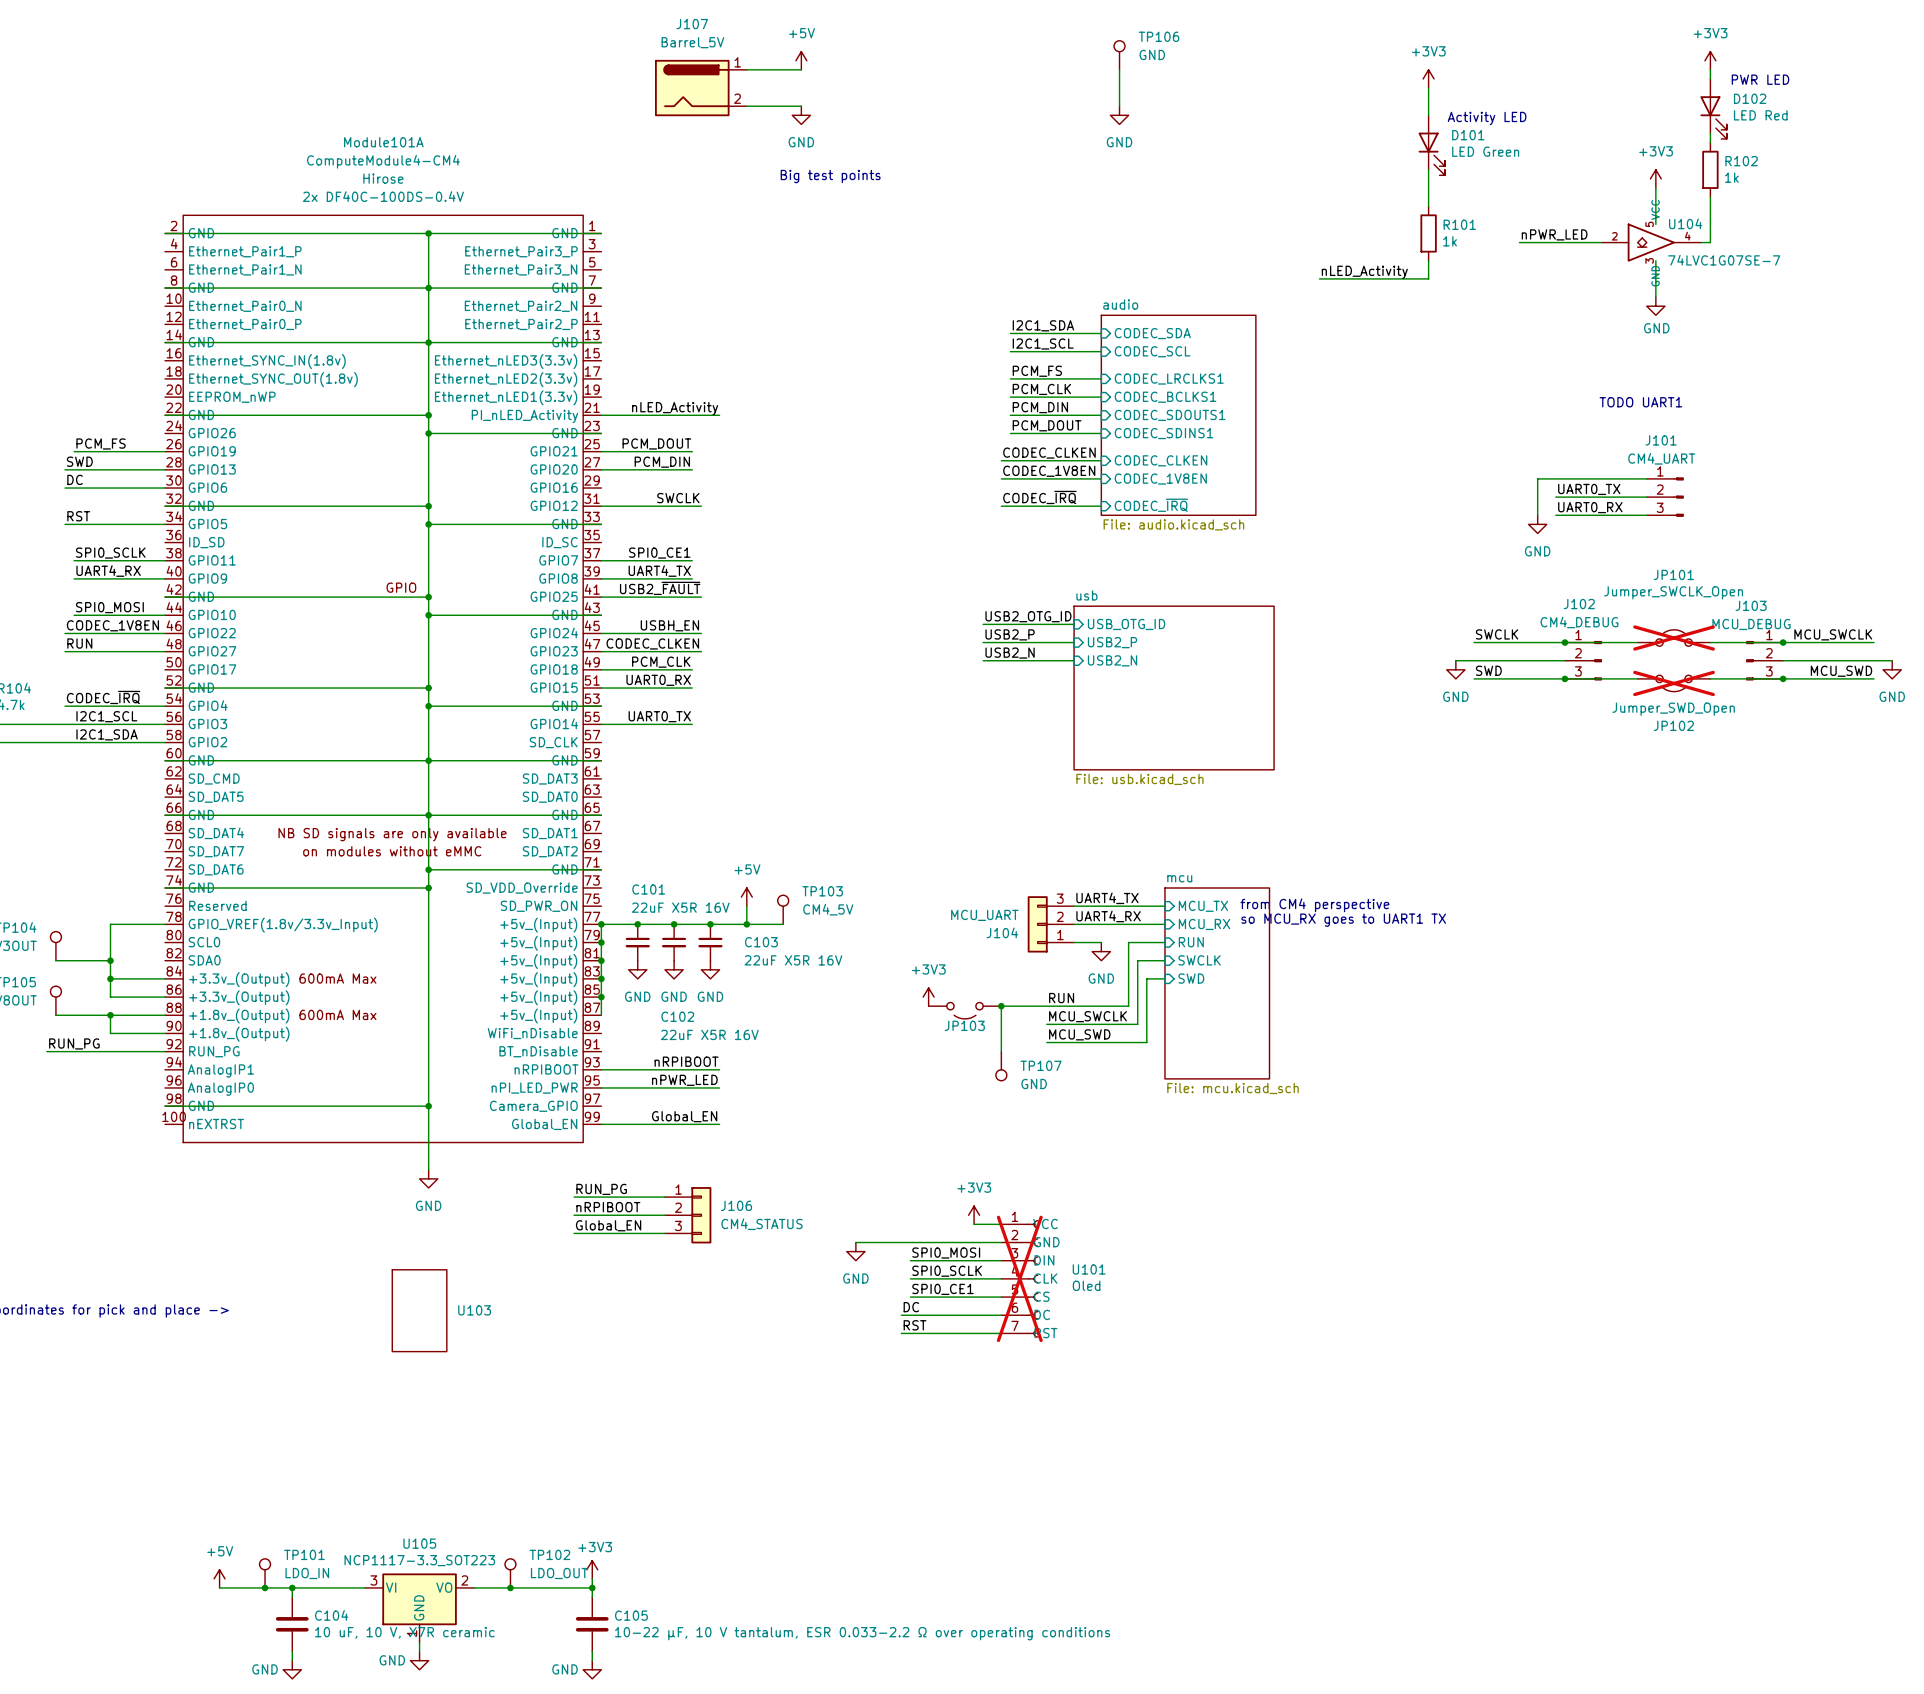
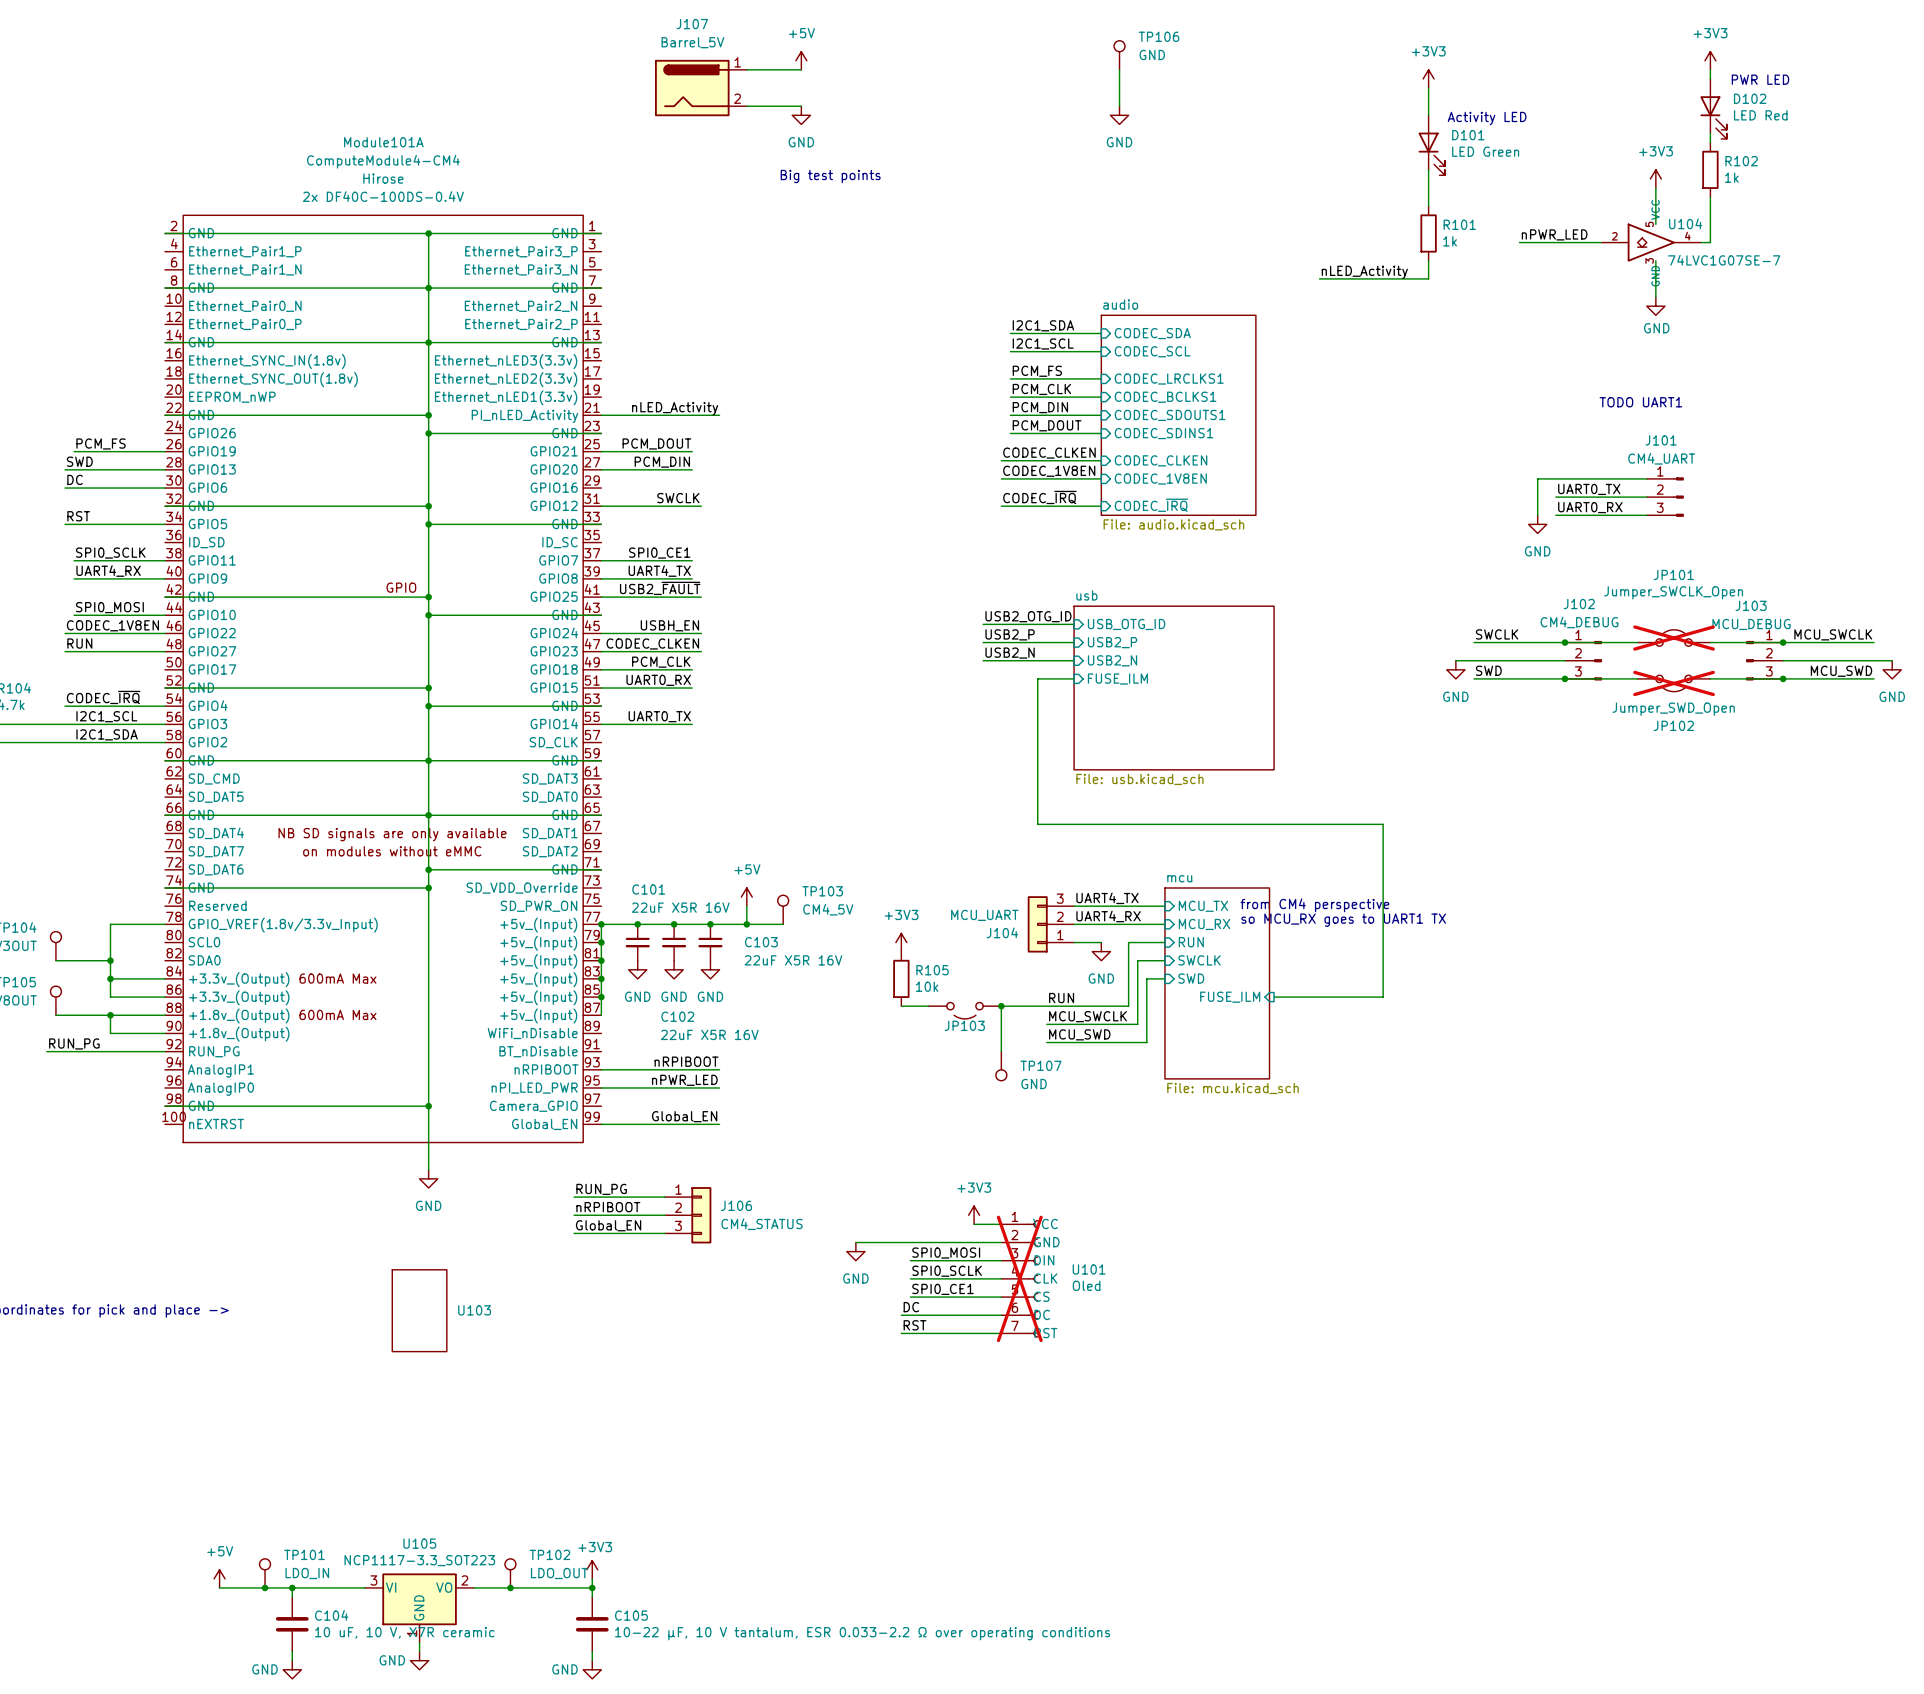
wire: none -> (1074, 678) (1037, 678) (1037, 824) (1383, 824) (1383, 997) (1274, 997)
sheet pin: none -> FUSE_ILM (1117, 679)
R105: none -> 10k (901, 978)
power symbol position: +3V3 (928, 997) -> +3V3 (901, 942)
sheet pin: none -> FUSE_ILM (1230, 997)
wire: none -> (901, 1006) (928, 1006)

